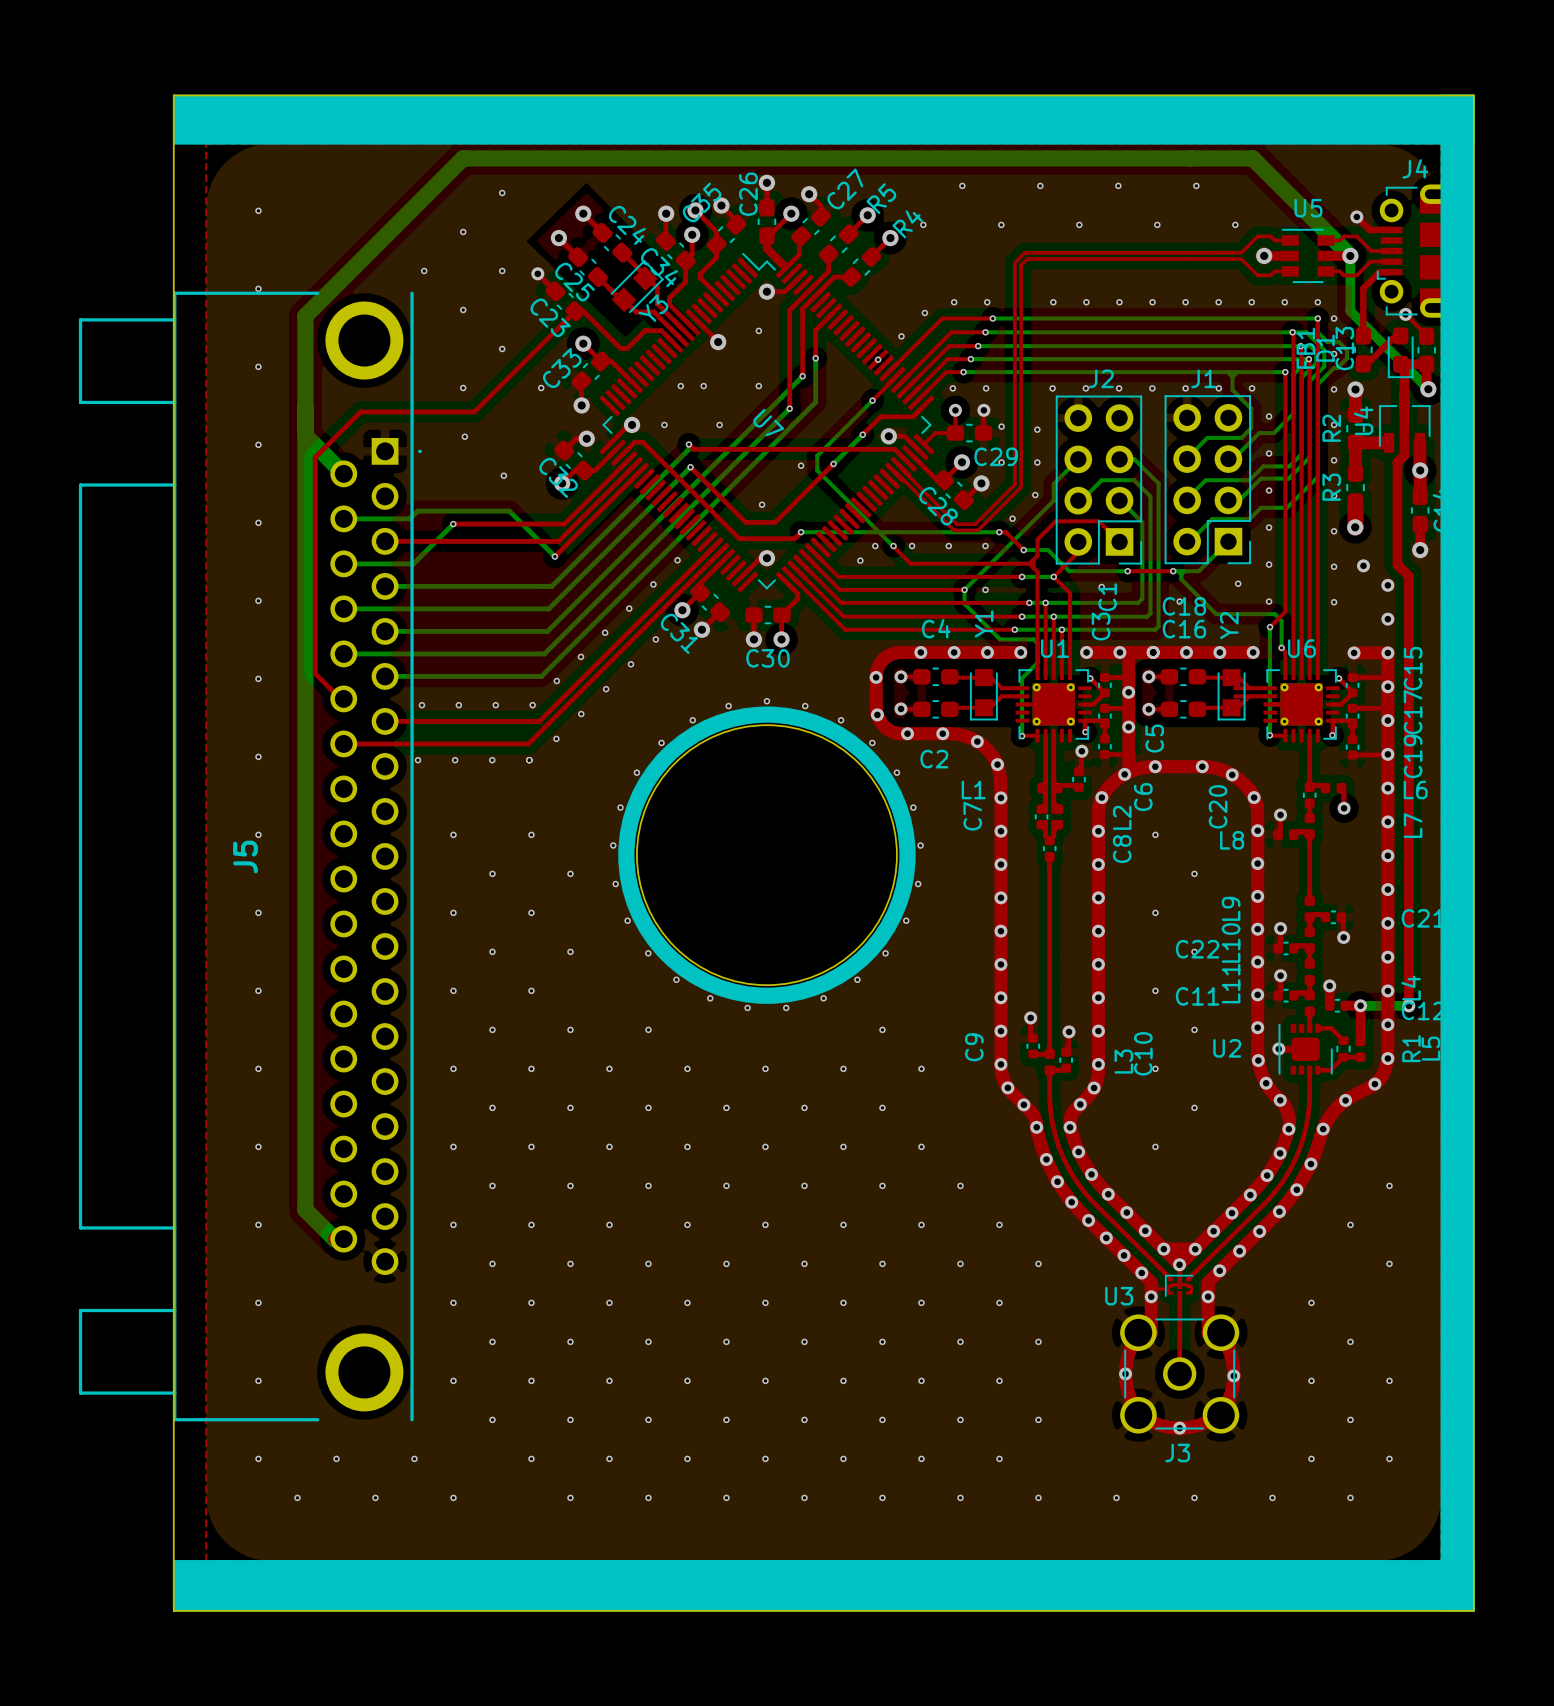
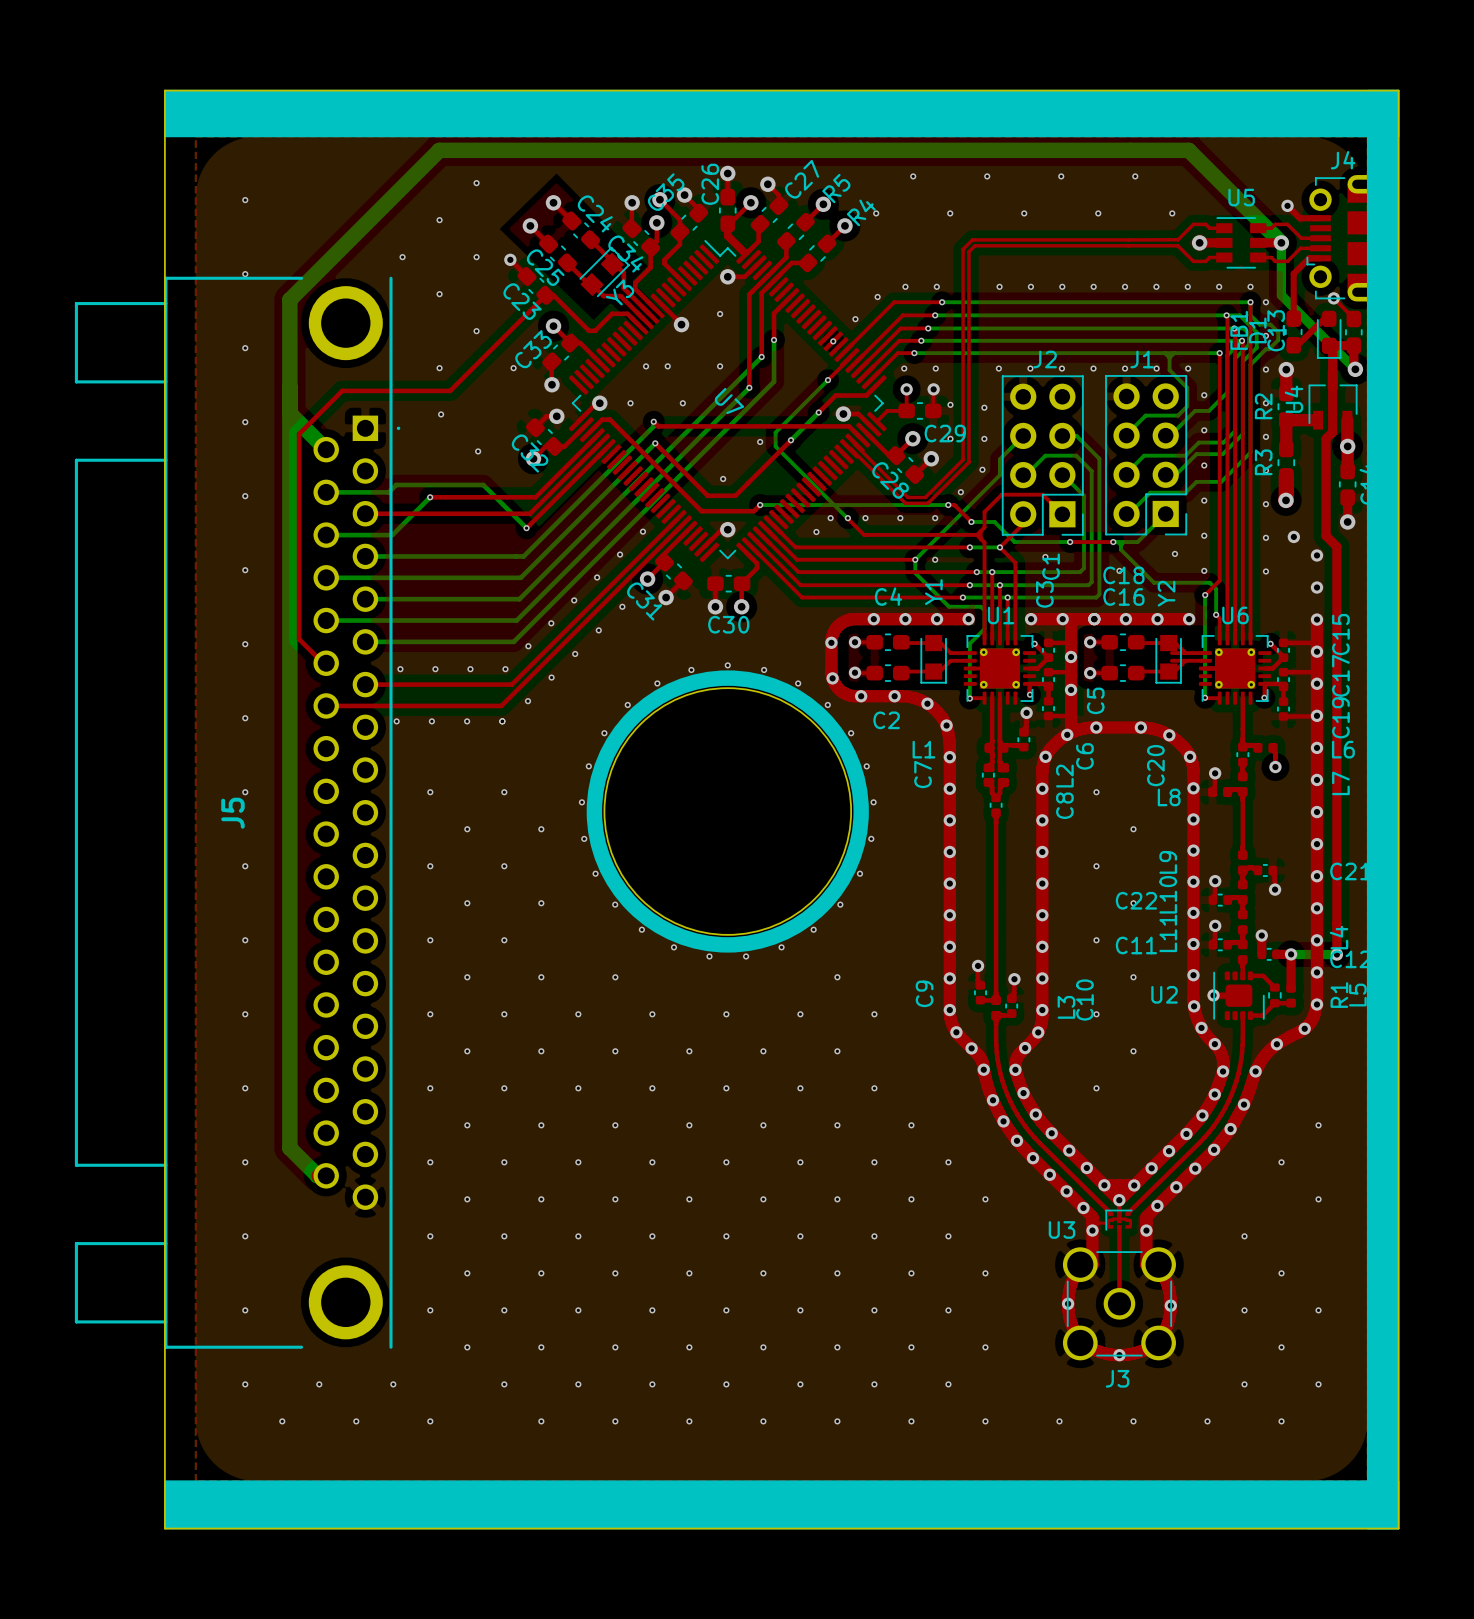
top track: (1354, 652) (1387, 652) -> none
via: (1354, 652) -> none

